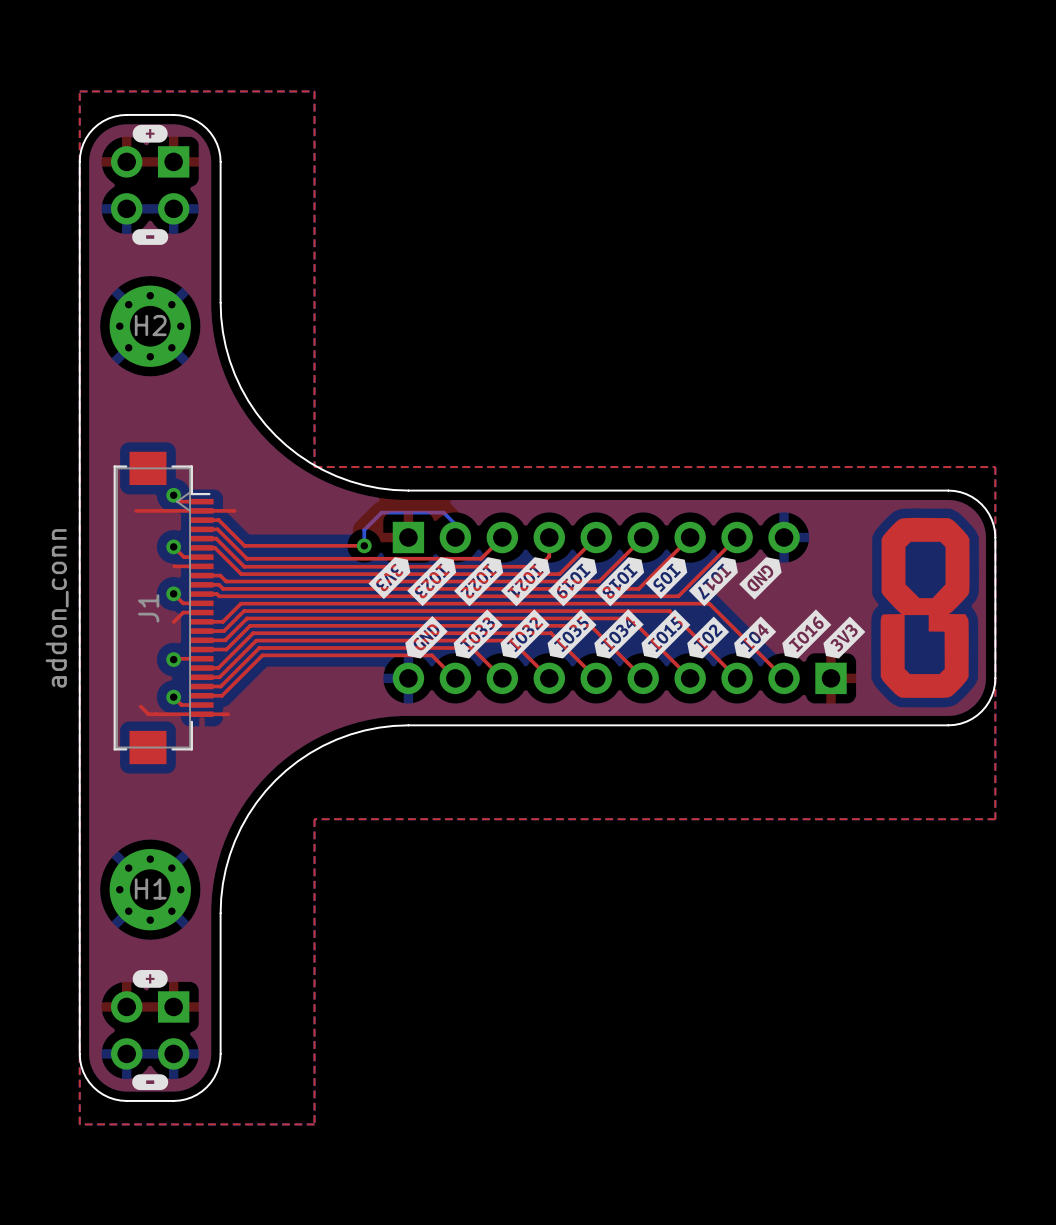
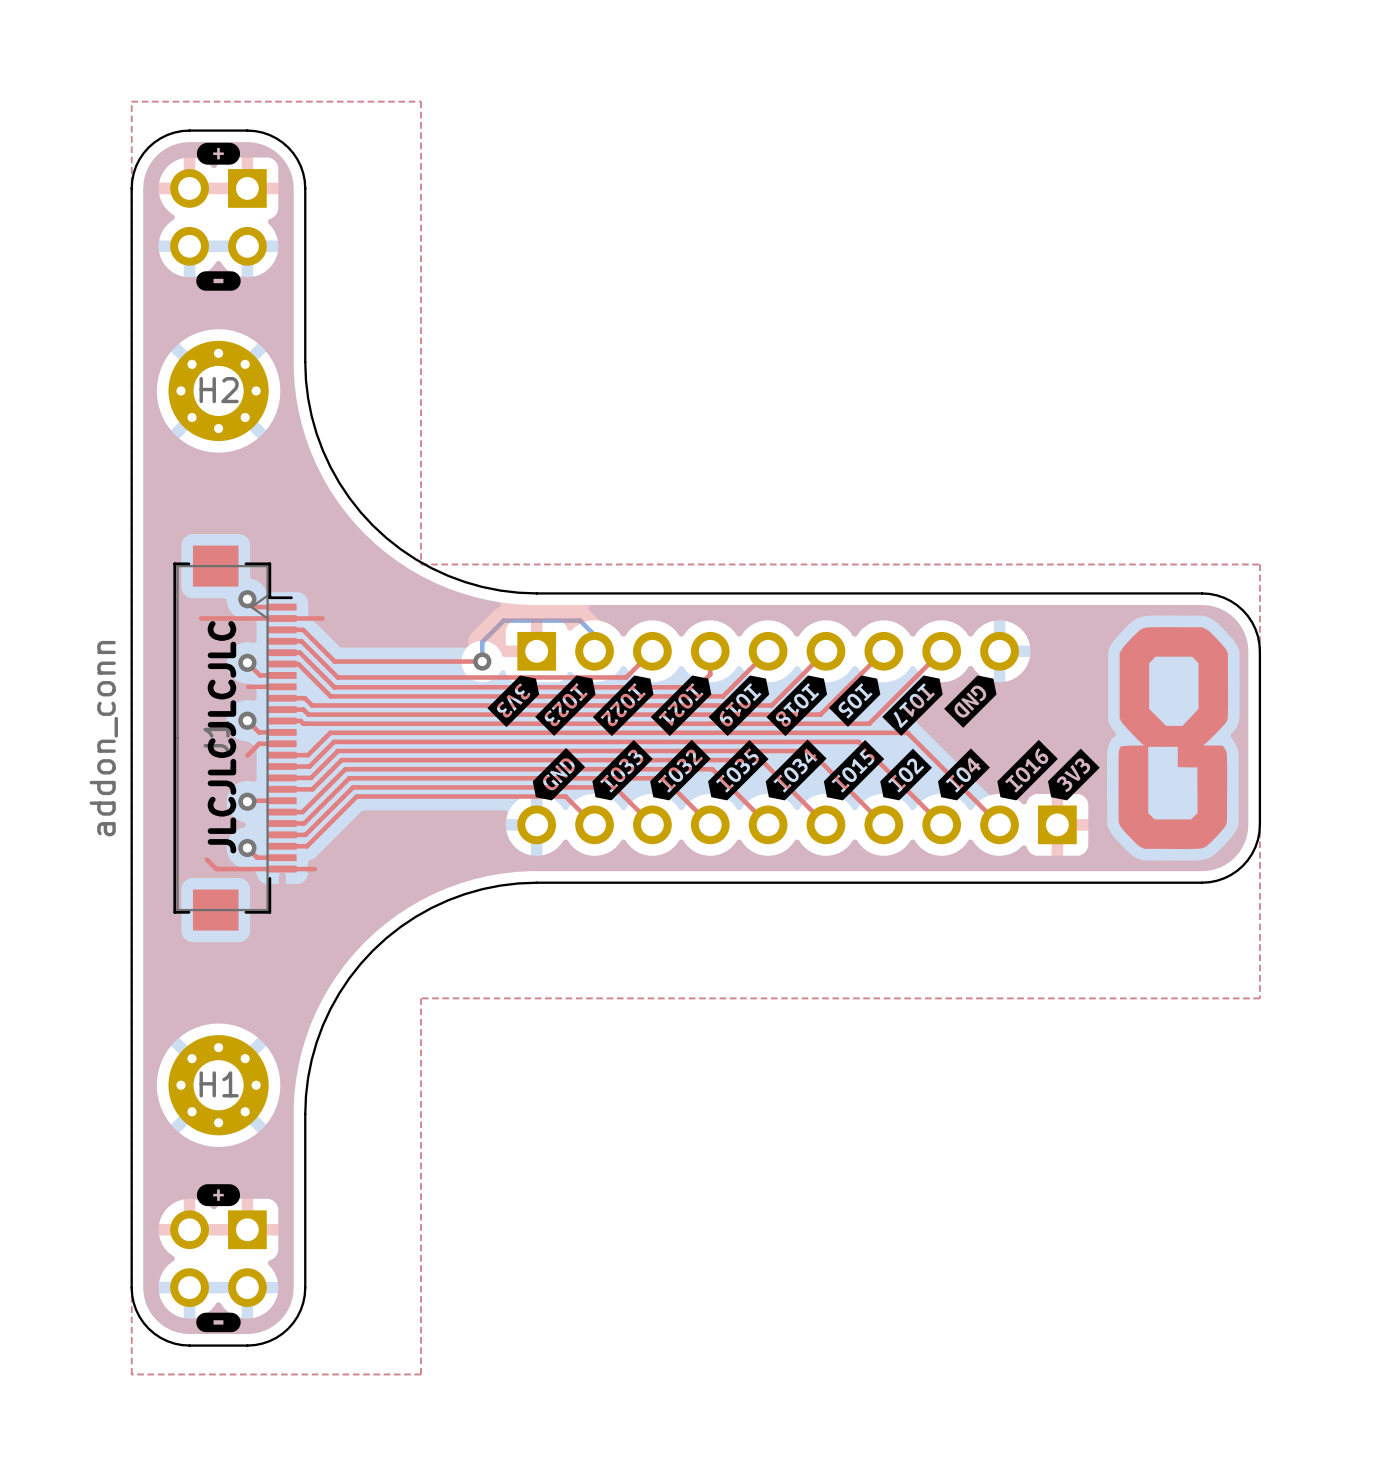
text: none -> JLCJLCJLCJLC (221, 737)

